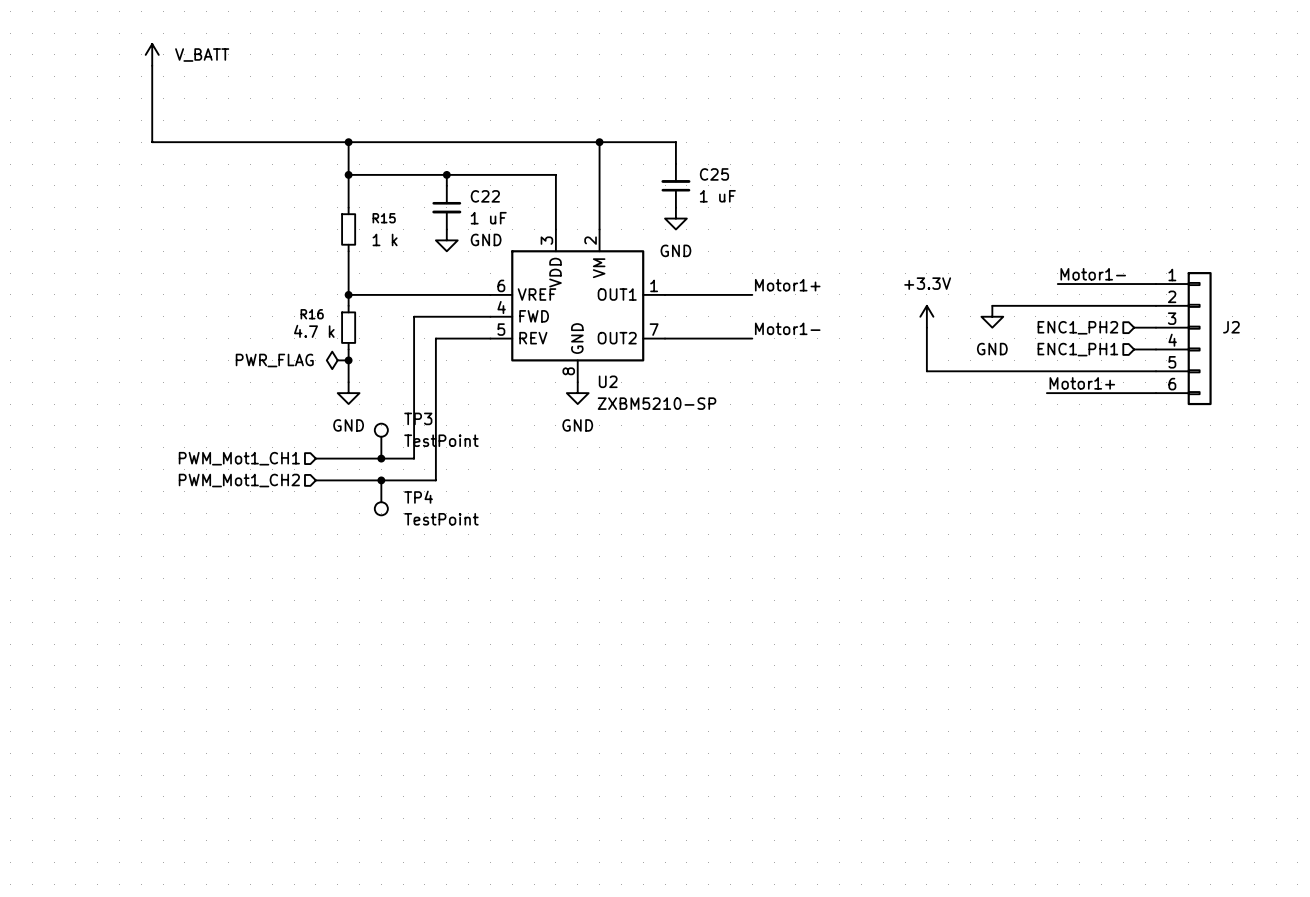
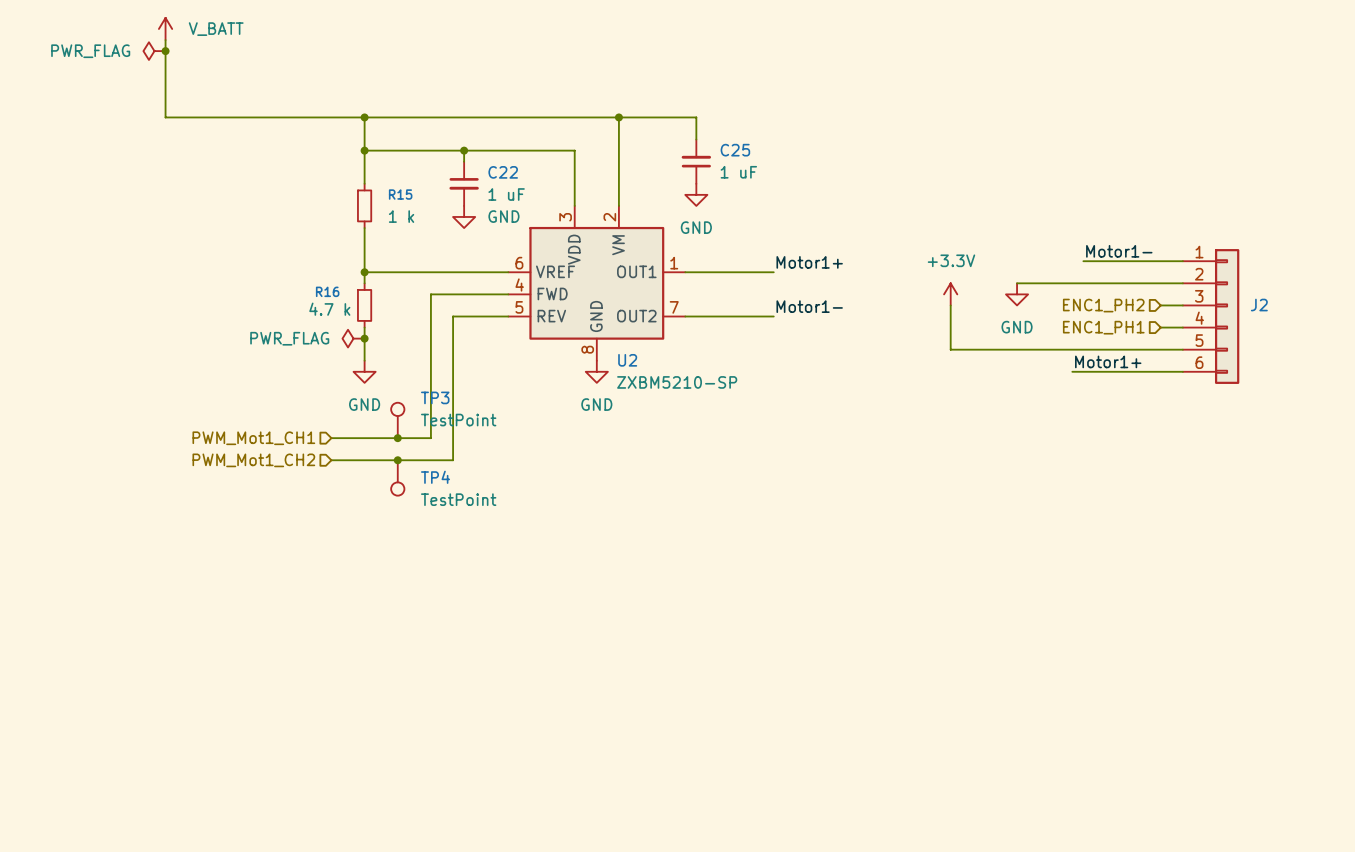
power symbol: none -> PWR_FLAG (154, 51)
junction: none -> (165, 51)

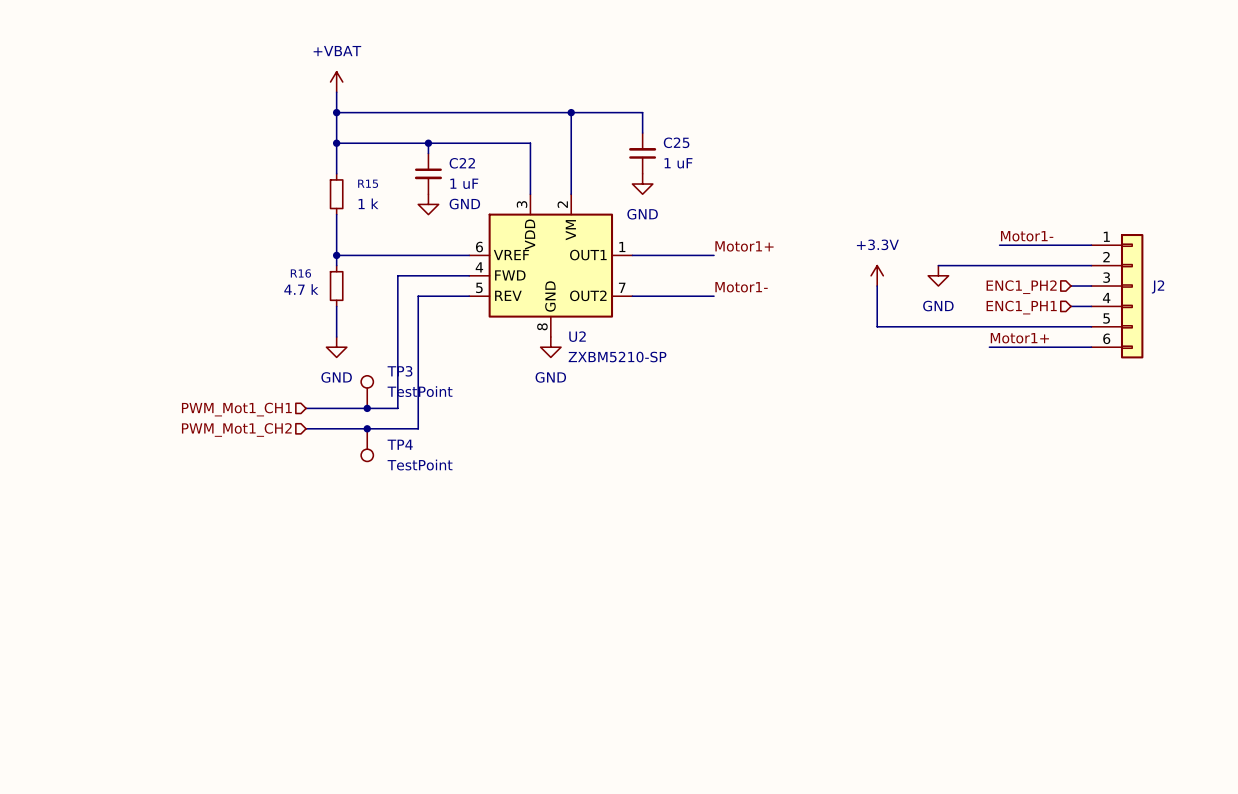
power symbol: V_BATT (165, 28) -> none
wire: (165, 40) (165, 117) (364, 117) -> (336, 92) (336, 112)
power symbol: PWR_FLAG (154, 51) -> none
junction: (165, 51) -> none
power symbol: none -> +VBAT (336, 82)
power symbol: PWR_FLAG (353, 338) -> none
junction: (364, 338) -> none

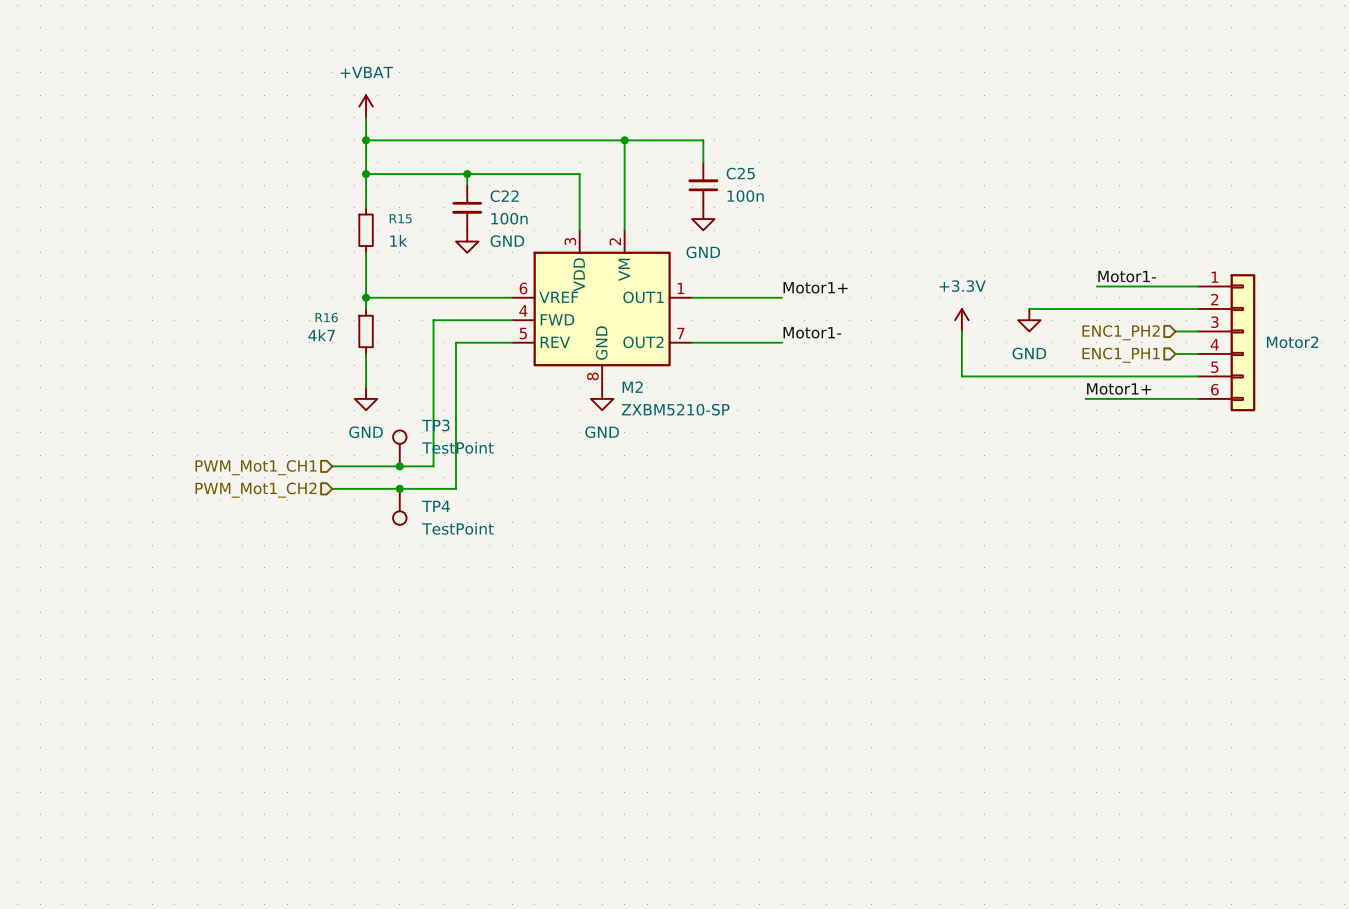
C25 value: 1 uF (678, 163) -> 100n (745, 196)
C22 value: 1 uF (464, 183) -> 100n (509, 218)
R15 value: 1 k (368, 203) -> 1k (398, 240)
J2 name: J2 (1158, 286) -> Motor2 (1292, 342)
R16 value: 4.7 k (301, 289) -> 4k7 (321, 335)
U2 name: U2 (577, 336) -> M2 (632, 387)

